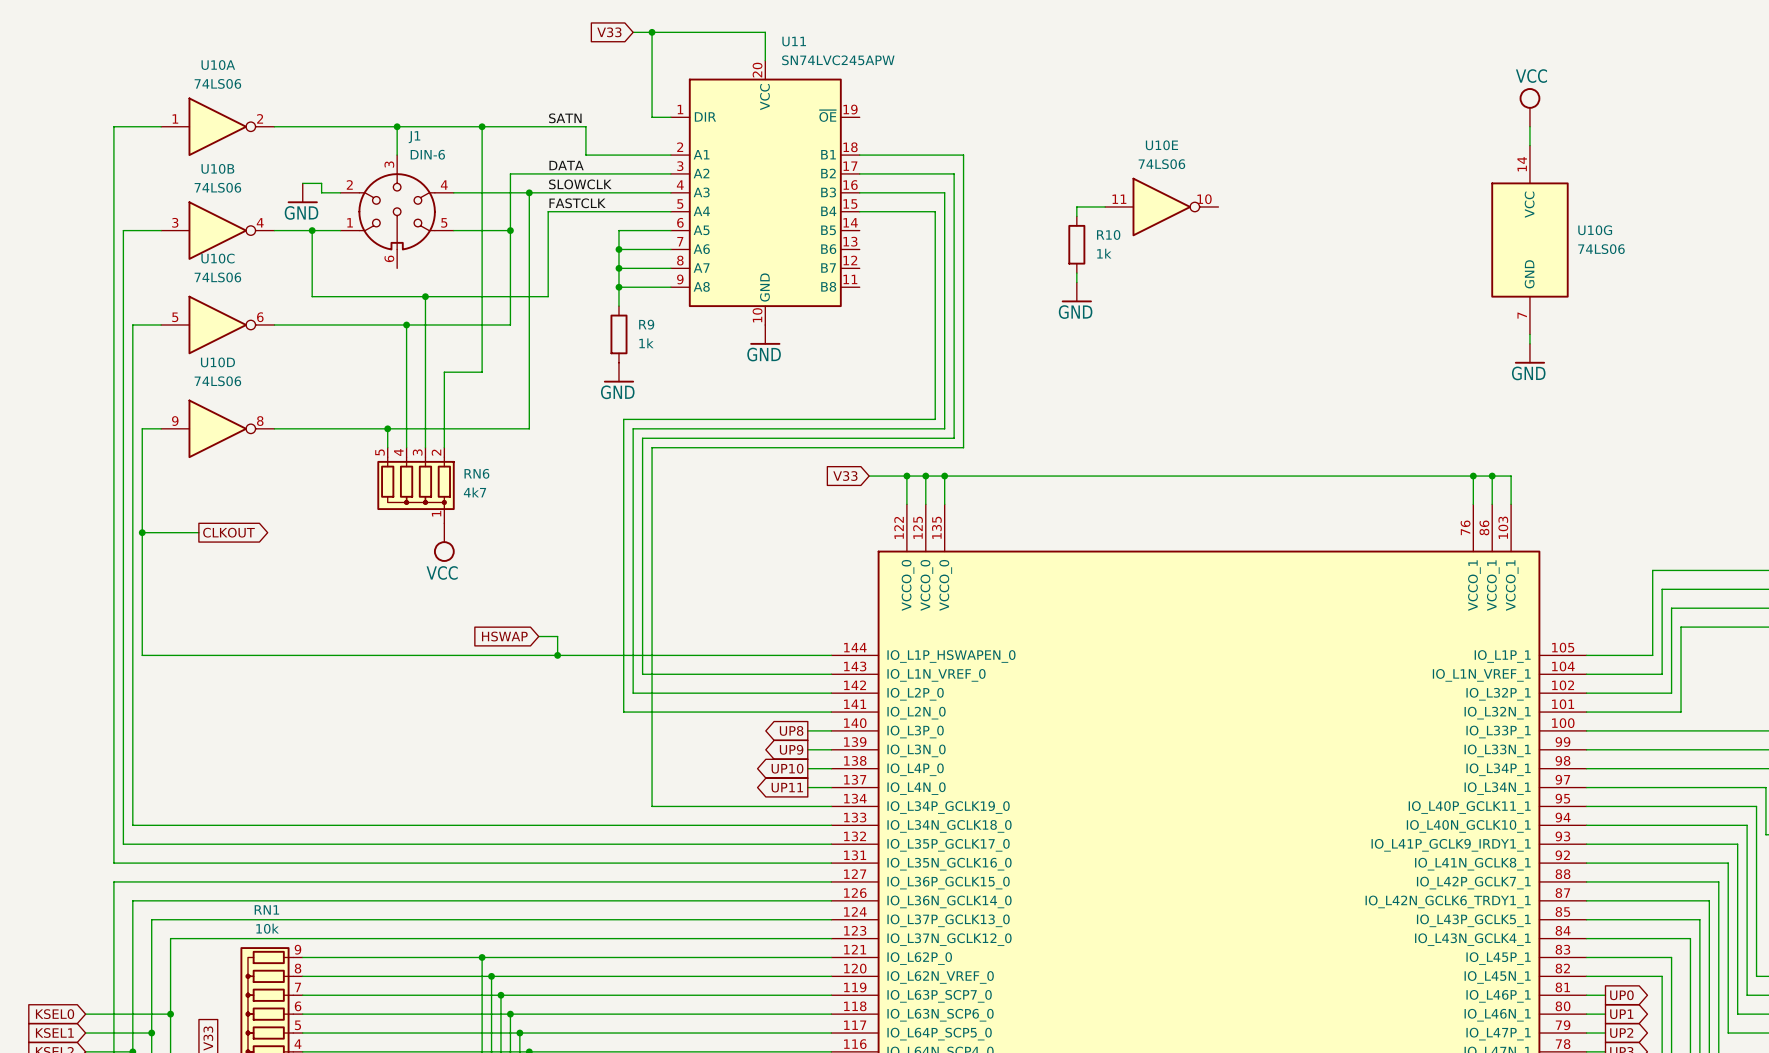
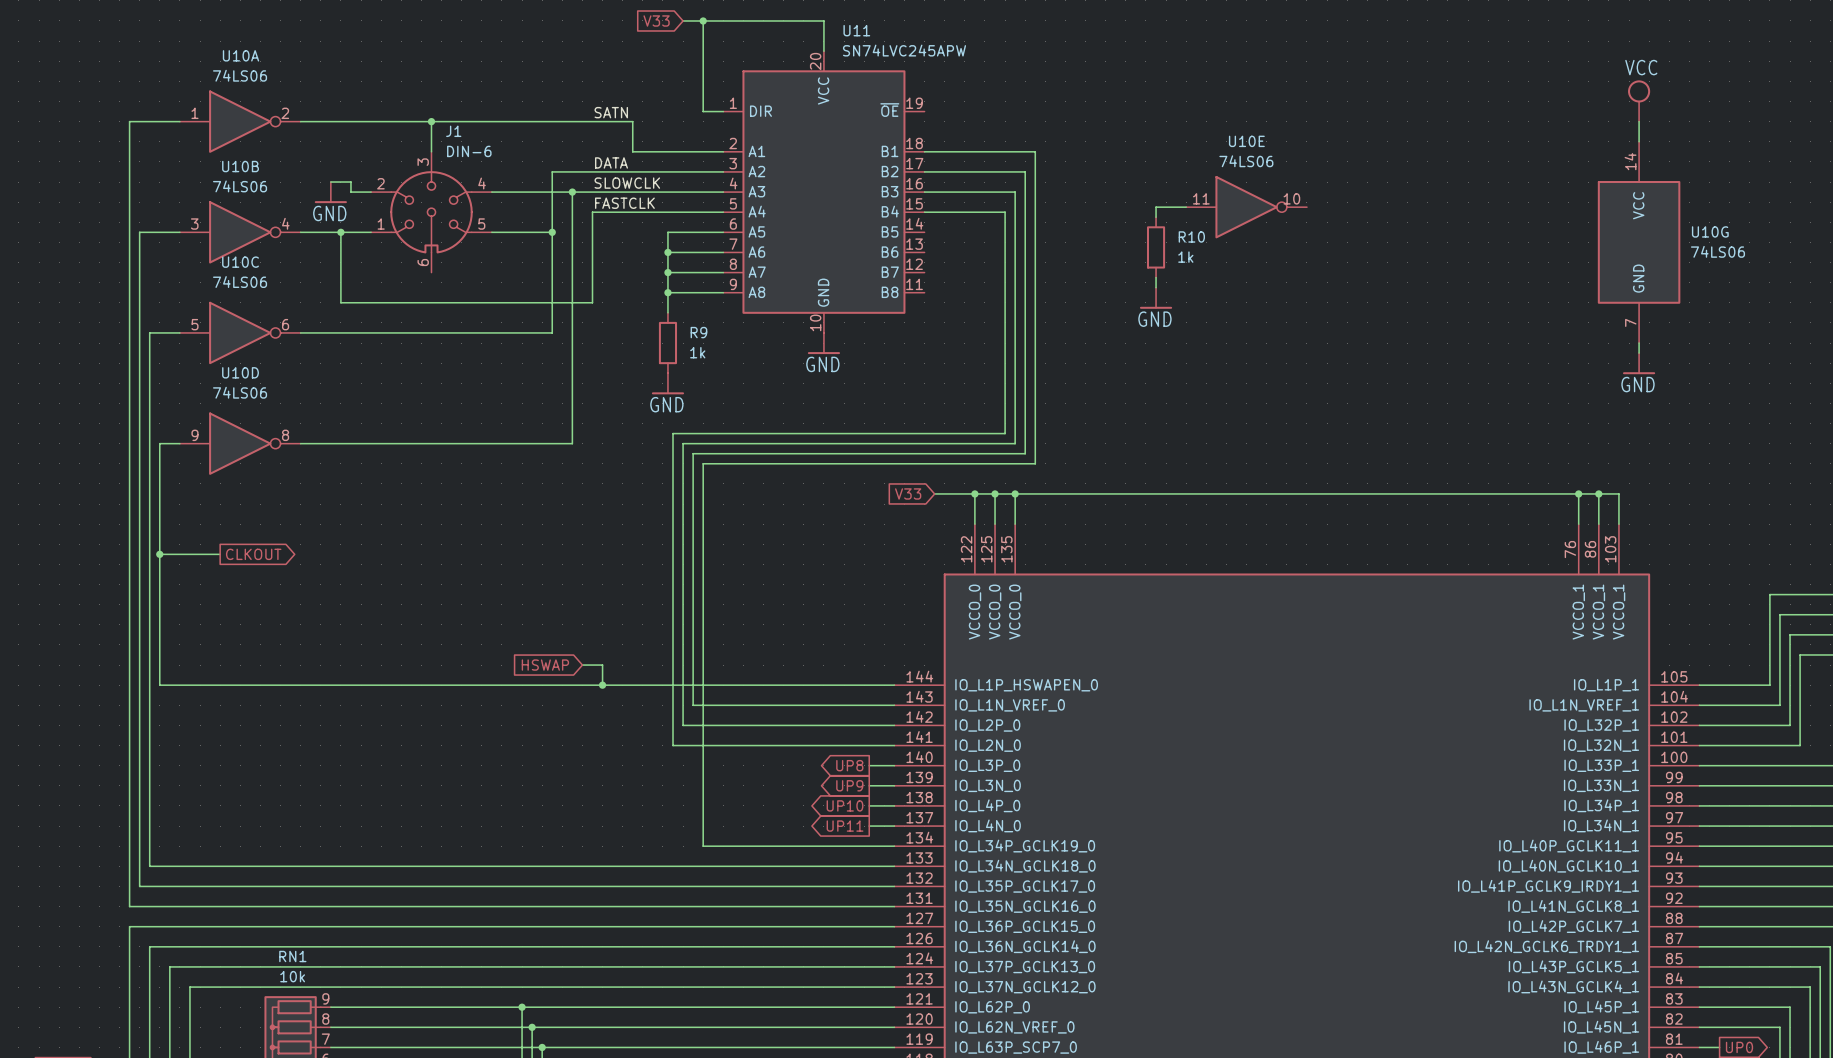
wire: (482, 126) (482, 372) (444, 372) (444, 447) -> none
junction: (482, 126) -> none
wire: (425, 296) (425, 447) -> none
junction: (425, 296) -> none
wire: (406, 324) (406, 447) -> none
junction: (406, 324) -> none
wire: (387, 428) (387, 447) -> none
junction: (387, 428) -> none
RN6: 4k7 (416, 485) -> none
power symbol: VCC (444, 542) -> none

